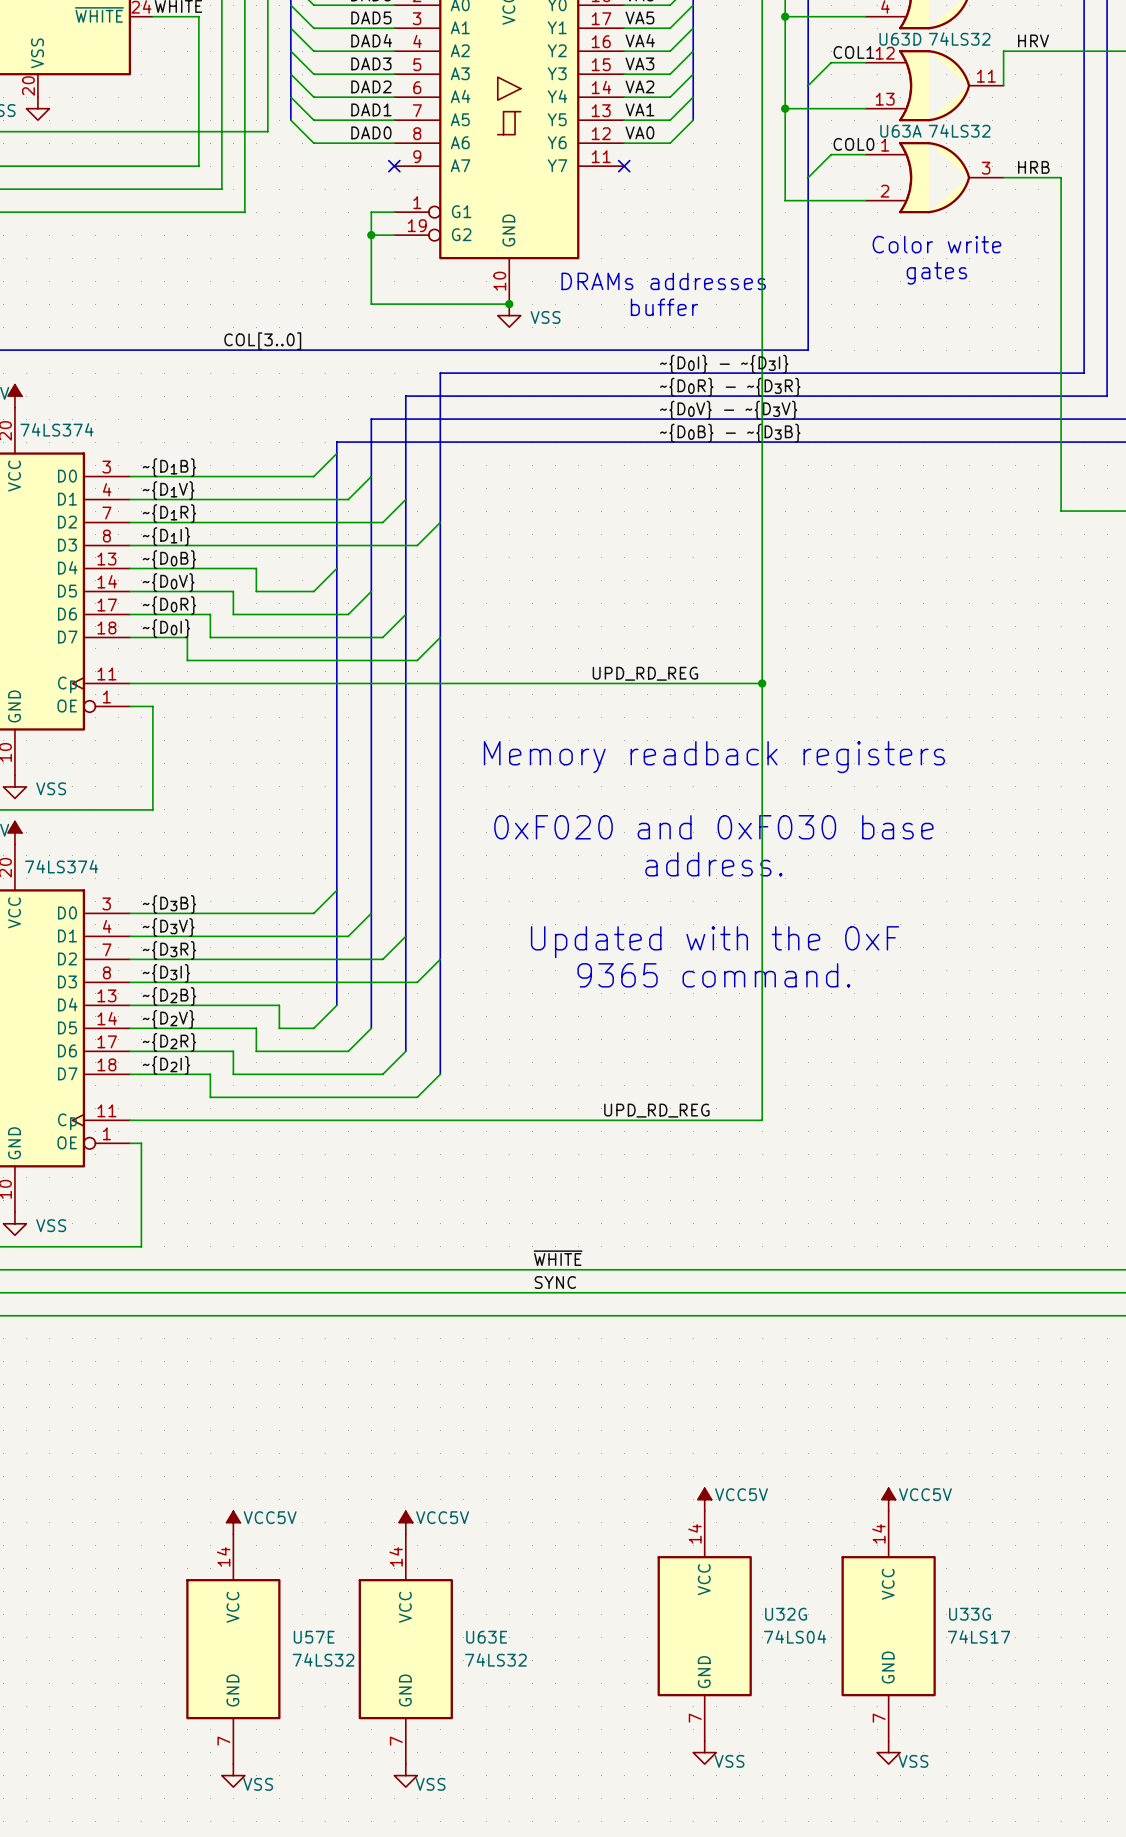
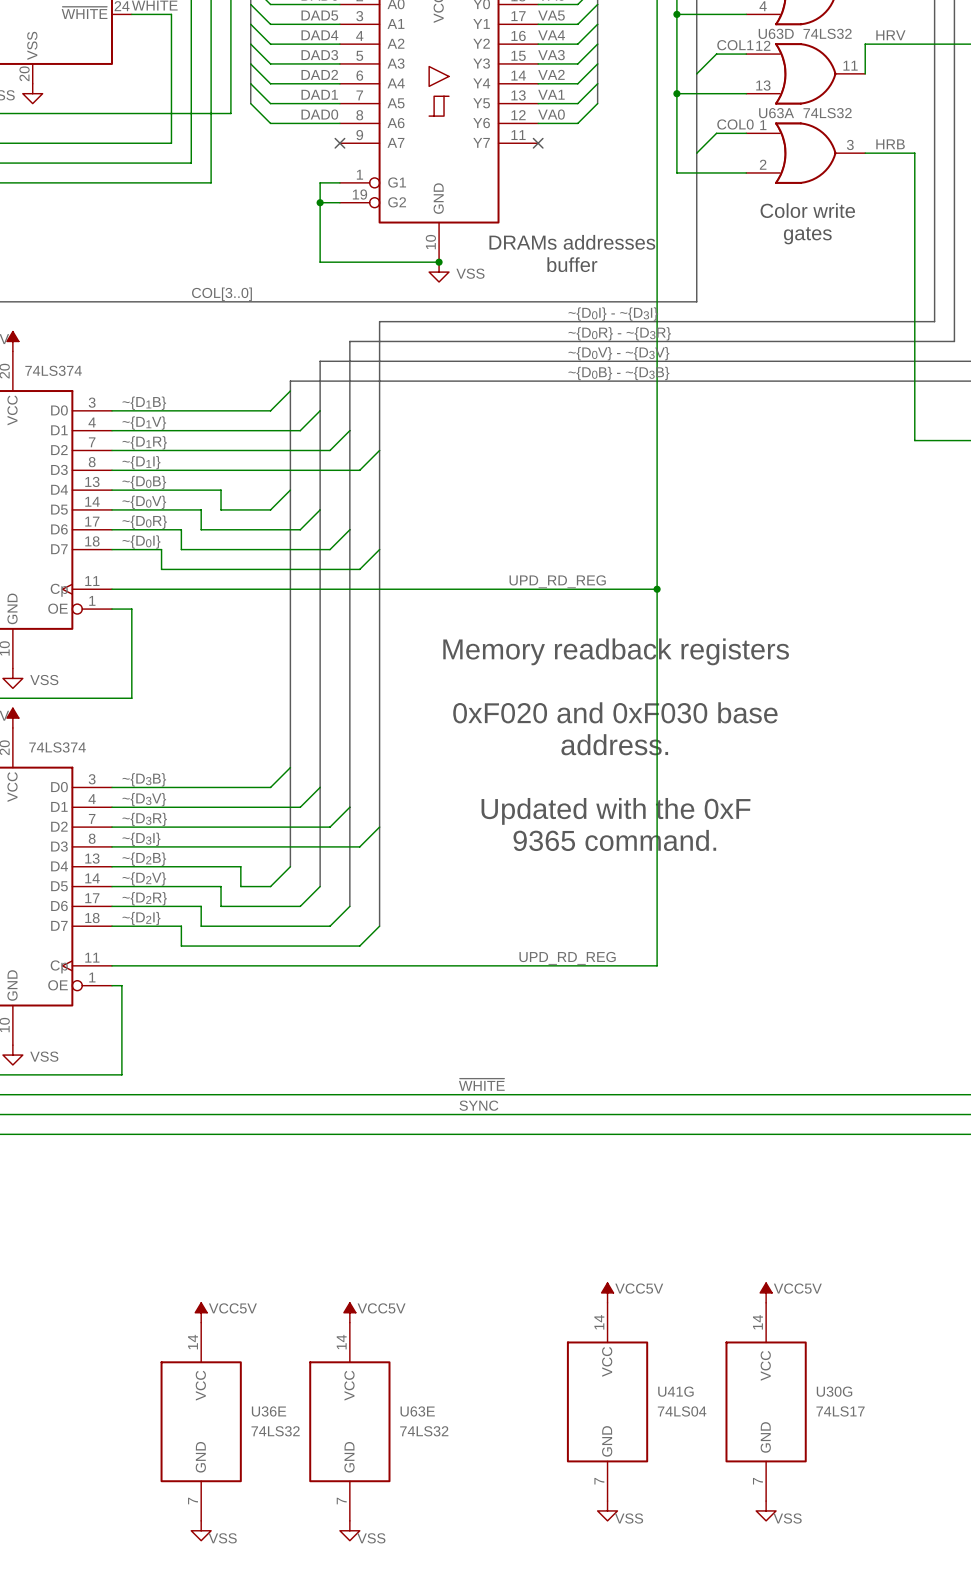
U32G name: U32G (786, 1614) -> U41G (675, 1391)
U33G name: U33G (970, 1614) -> U30G (834, 1391)
U57E name: U57E (314, 1637) -> U36E (269, 1411)

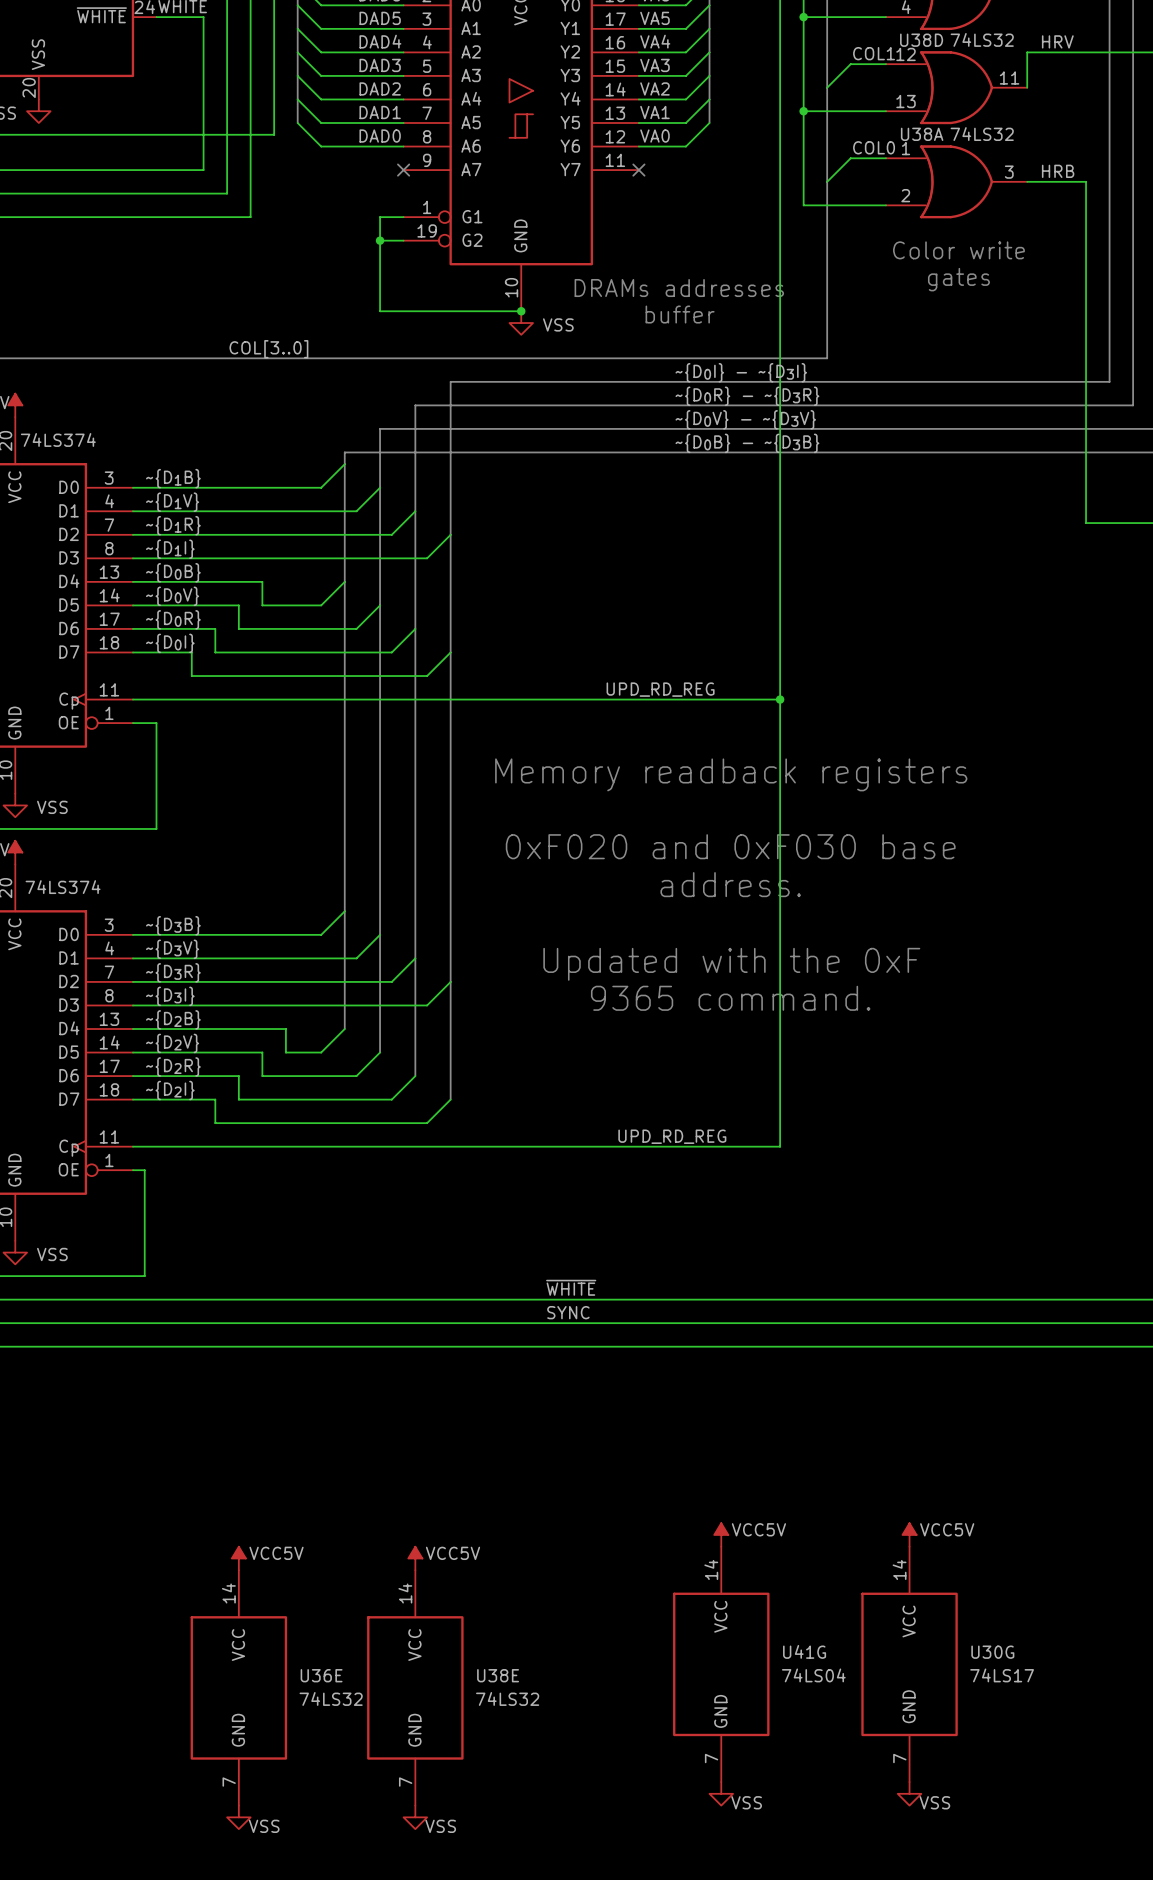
U63D name: U63D (776, 33) -> U38D (921, 40)
U63A name: U63A (776, 113) -> U38A (922, 134)
U63E name: U63E (417, 1411) -> U38E (498, 1675)

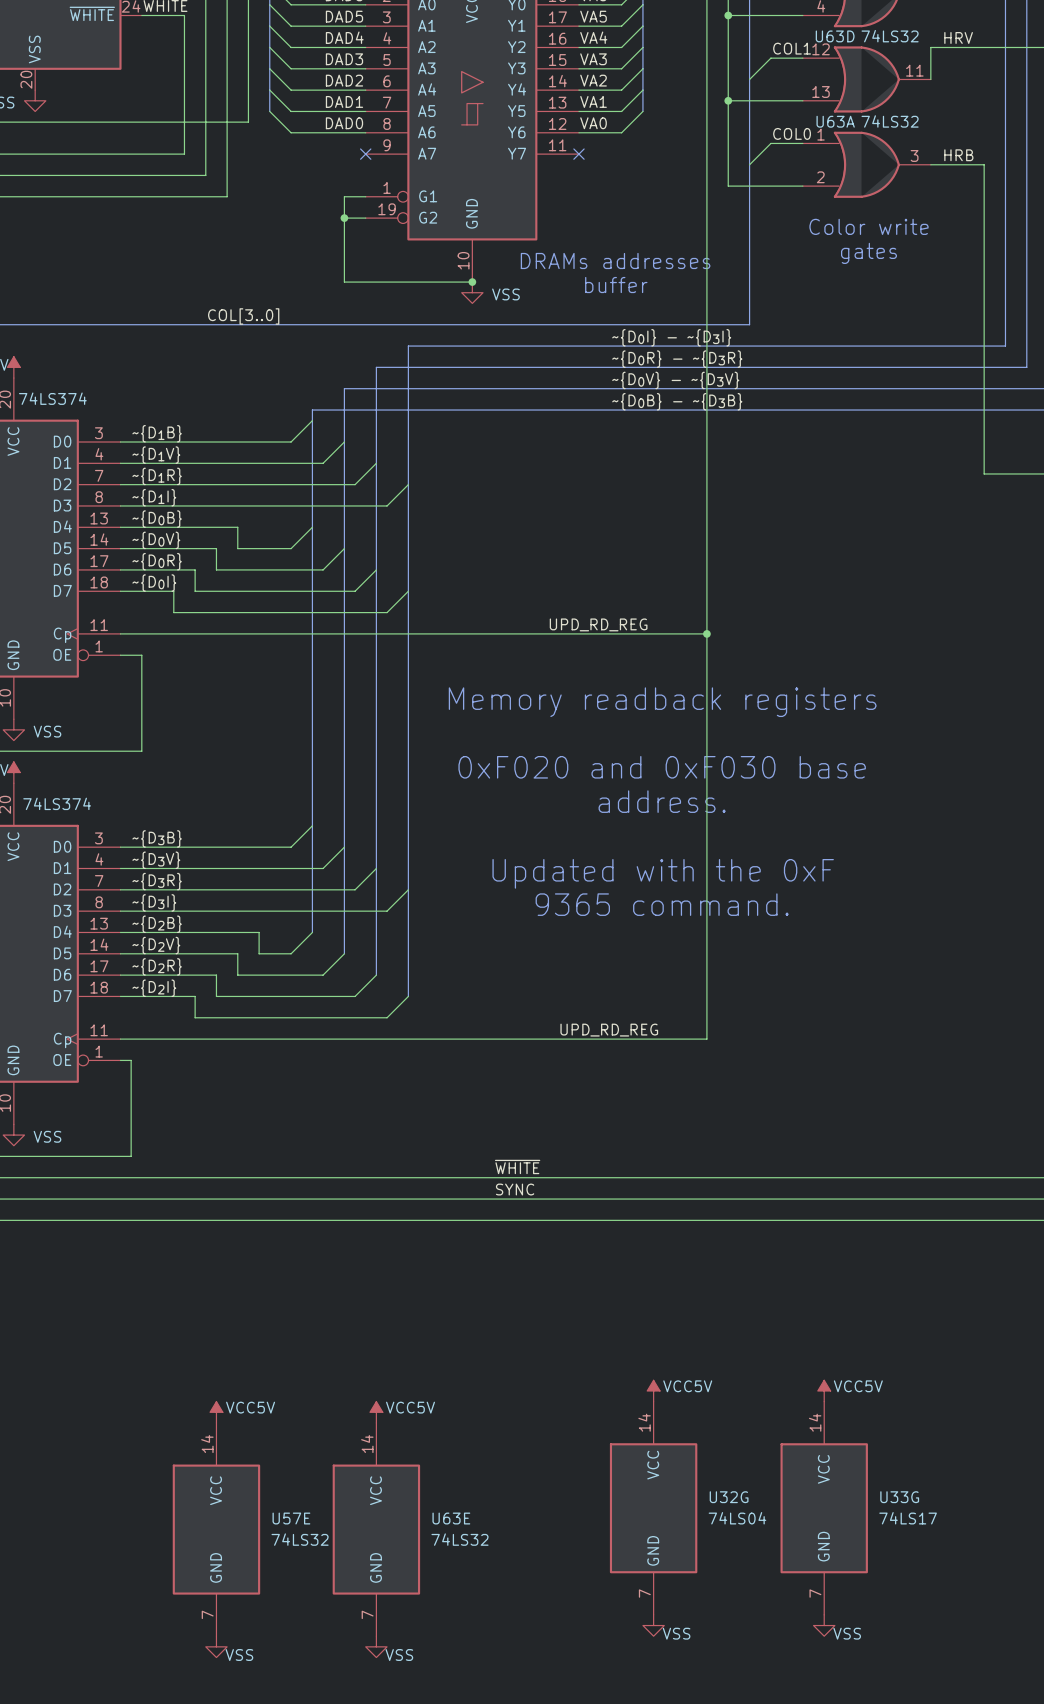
U38D name: U38D (921, 40) -> U63D (835, 36)
U38A name: U38A (922, 134) -> U63A (835, 121)
U41G name: U41G (804, 1651) -> U32G (729, 1497)
U30G name: U30G (992, 1652) -> U33G (899, 1497)
U36E name: U36E (321, 1675) -> U57E (291, 1518)
U38E name: U38E (498, 1675) -> U63E (451, 1518)

